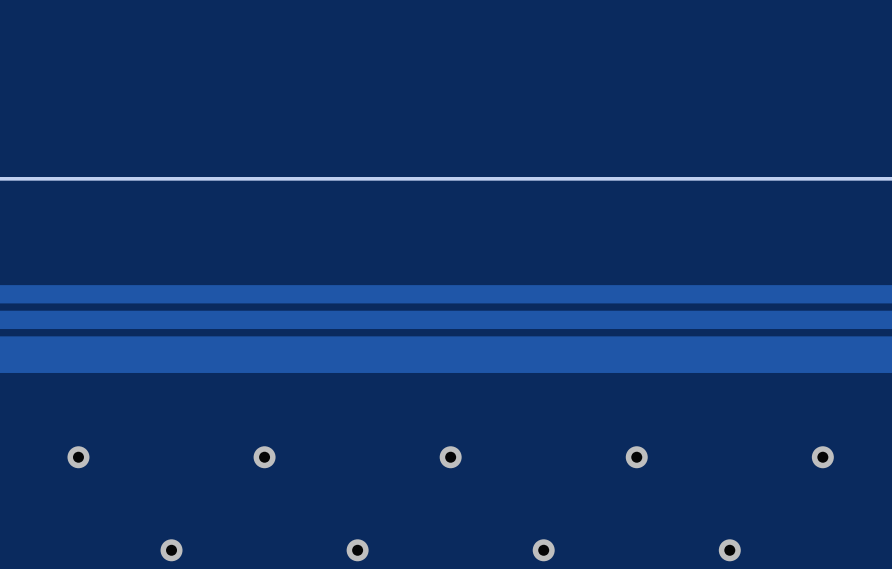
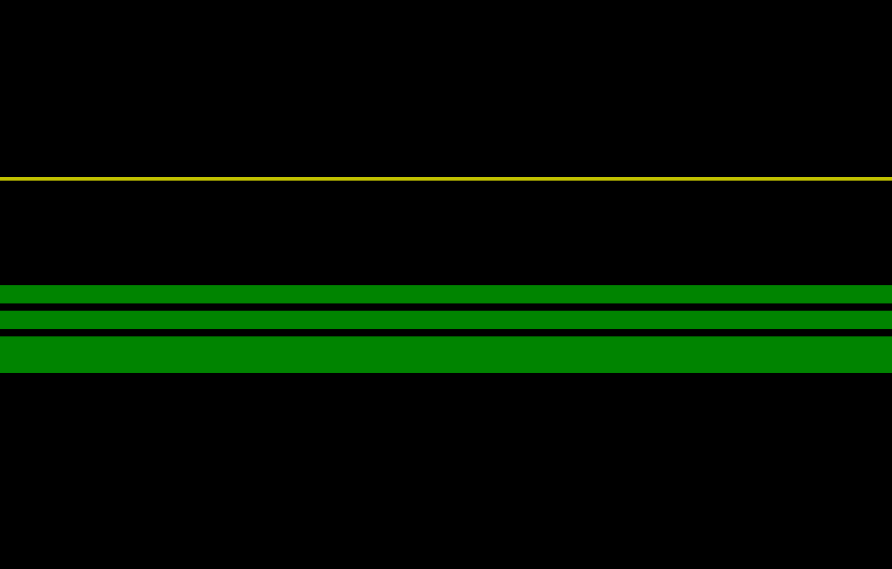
via: (78, 457) -> none
via: (264, 457) -> none
via: (450, 457) -> none
via: (636, 457) -> none
via: (822, 457) -> none
via: (171, 550) -> none
via: (357, 550) -> none
via: (543, 550) -> none
via: (729, 550) -> none

